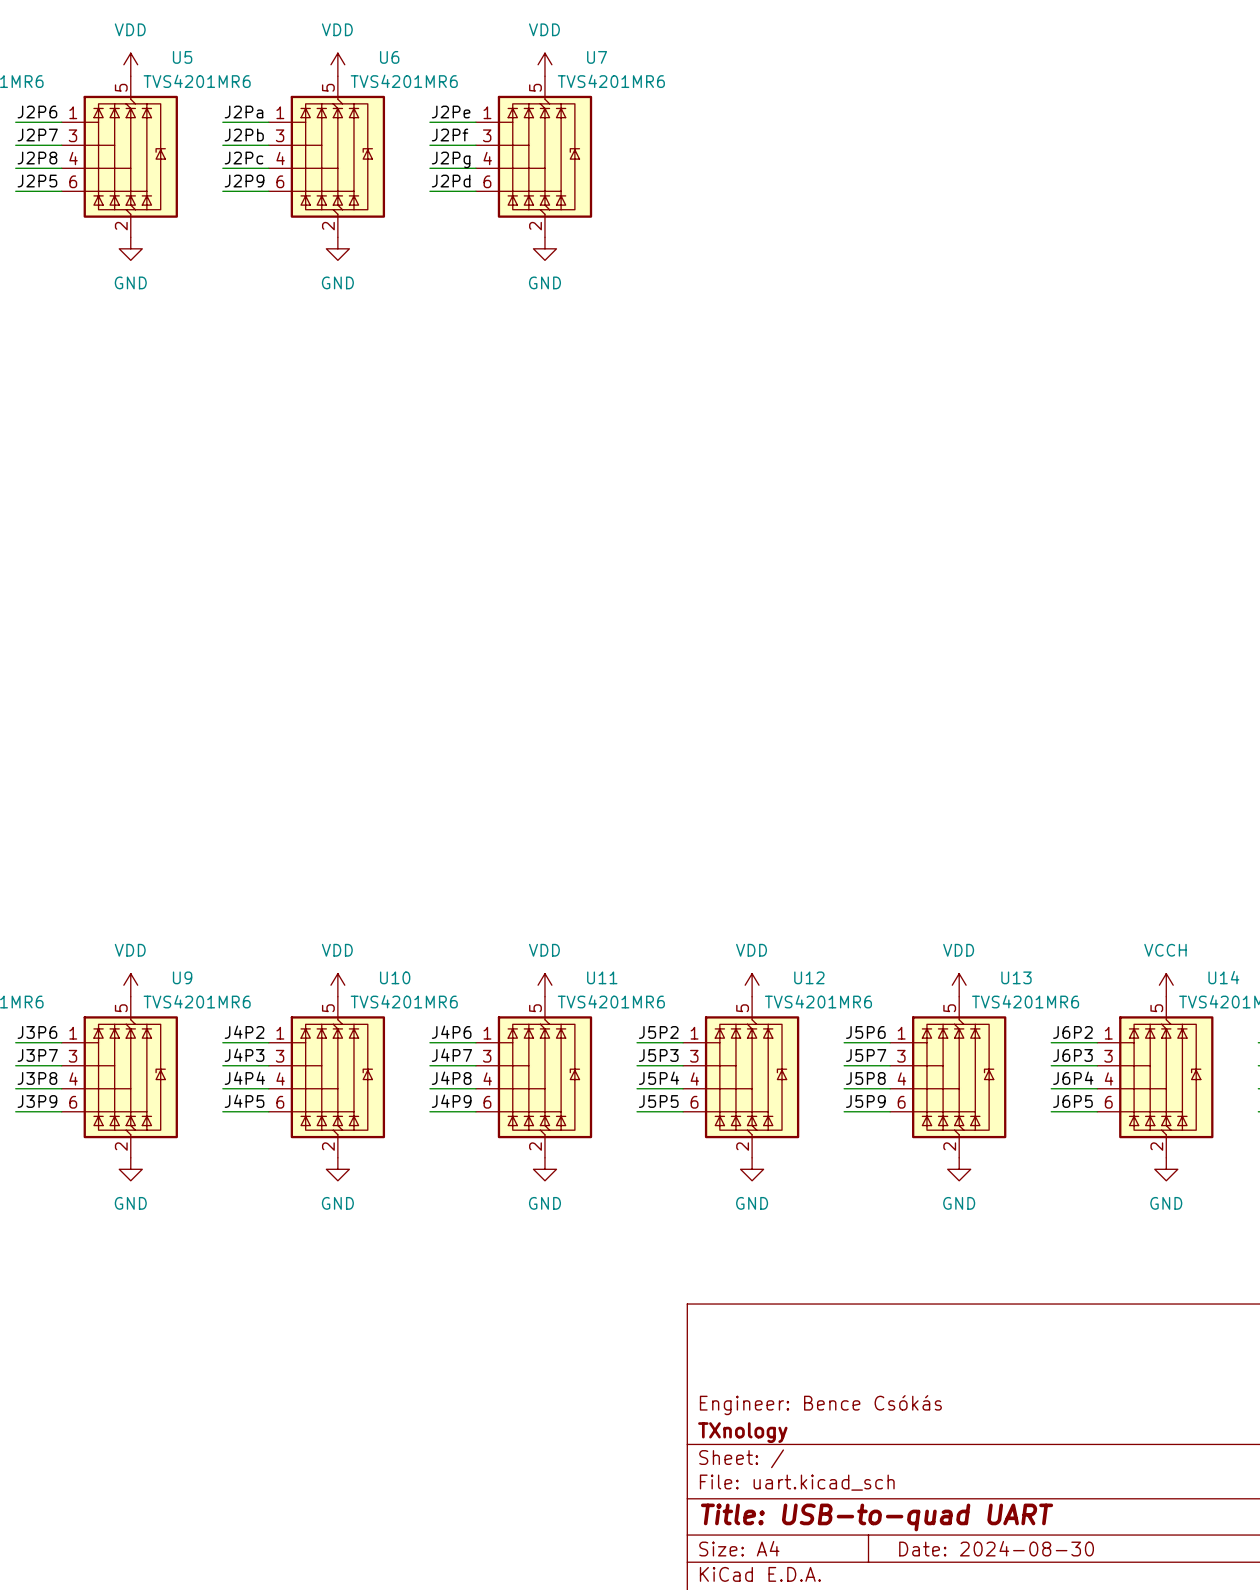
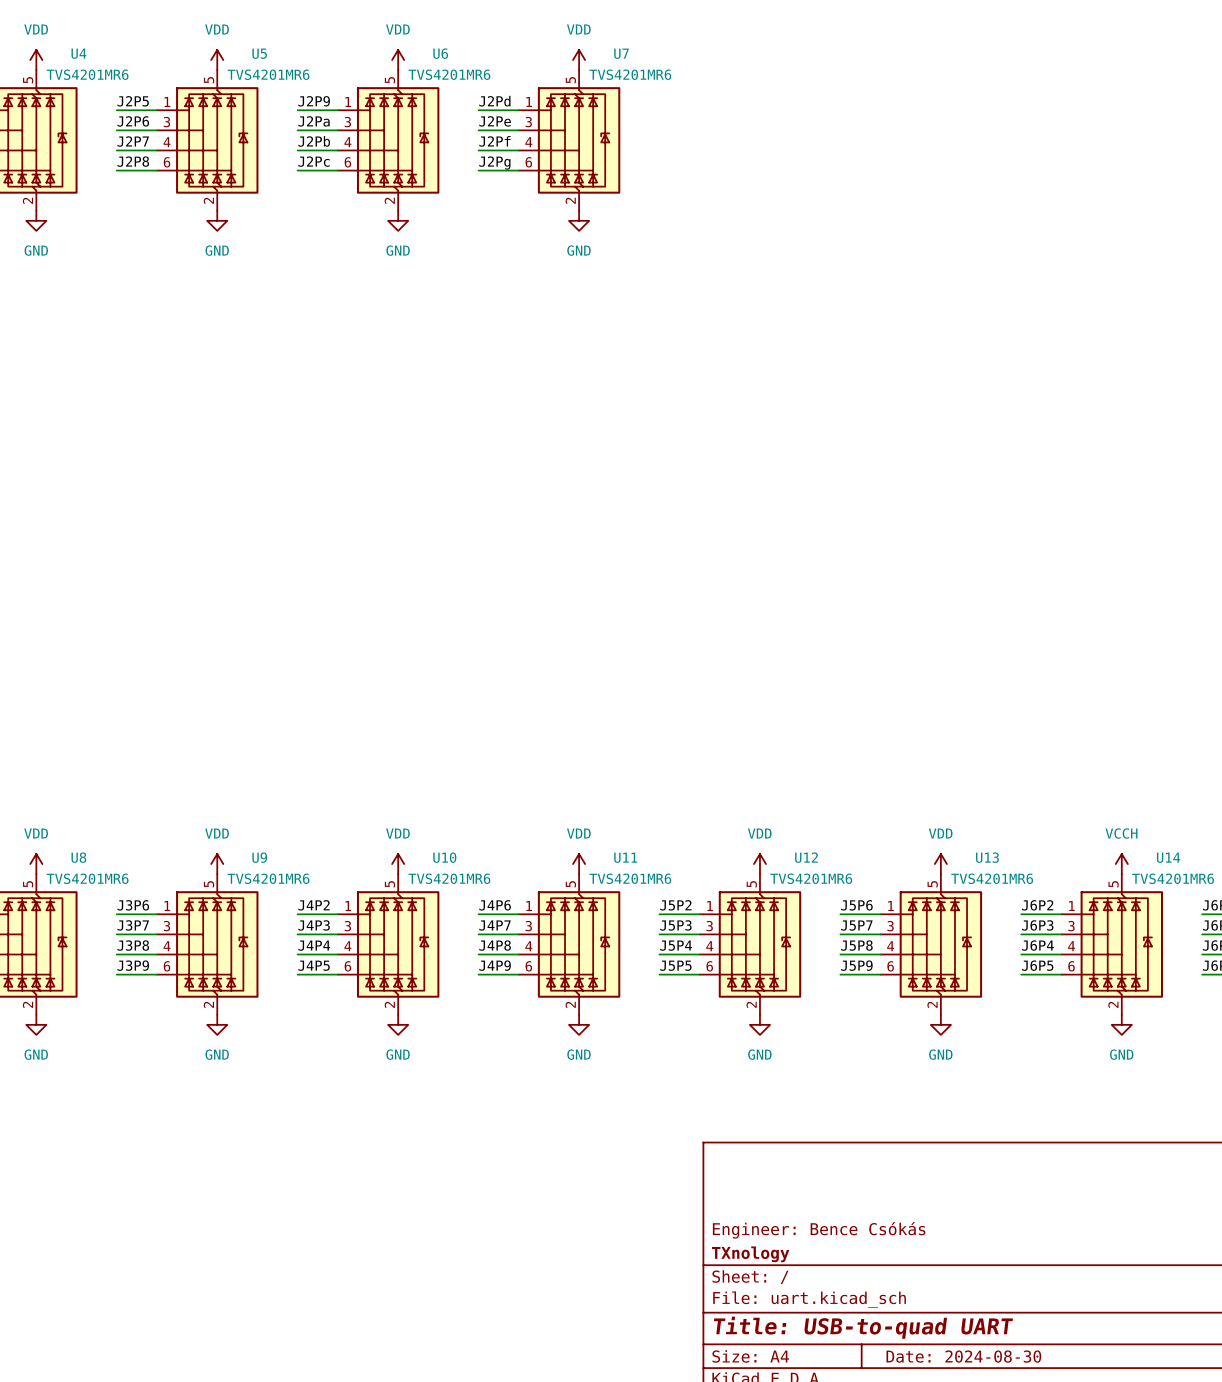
label: J2P6 (37, 112) -> J2P5 (133, 101)
label: J2Pa (244, 112) -> J2P9 (314, 101)
label: J2Pe (451, 112) -> J2Pd (494, 101)
label: J2P7 (37, 135) -> J2P6 (133, 121)
label: J2Pb (244, 135) -> J2Pa (314, 121)
label: J2Pf (450, 135) -> J2Pe (495, 121)
label: J2P8 (37, 158) -> J2P7 (133, 141)
label: J2Pc (244, 158) -> J2Pb (314, 141)
label: J2Pg (451, 159) -> J2Pf (494, 141)
label: J2P5 (37, 181) -> J2P8 (133, 161)
label: J2P9 (244, 181) -> J2Pc (314, 161)
label: J2Pd (451, 181) -> J2Pg (494, 162)

